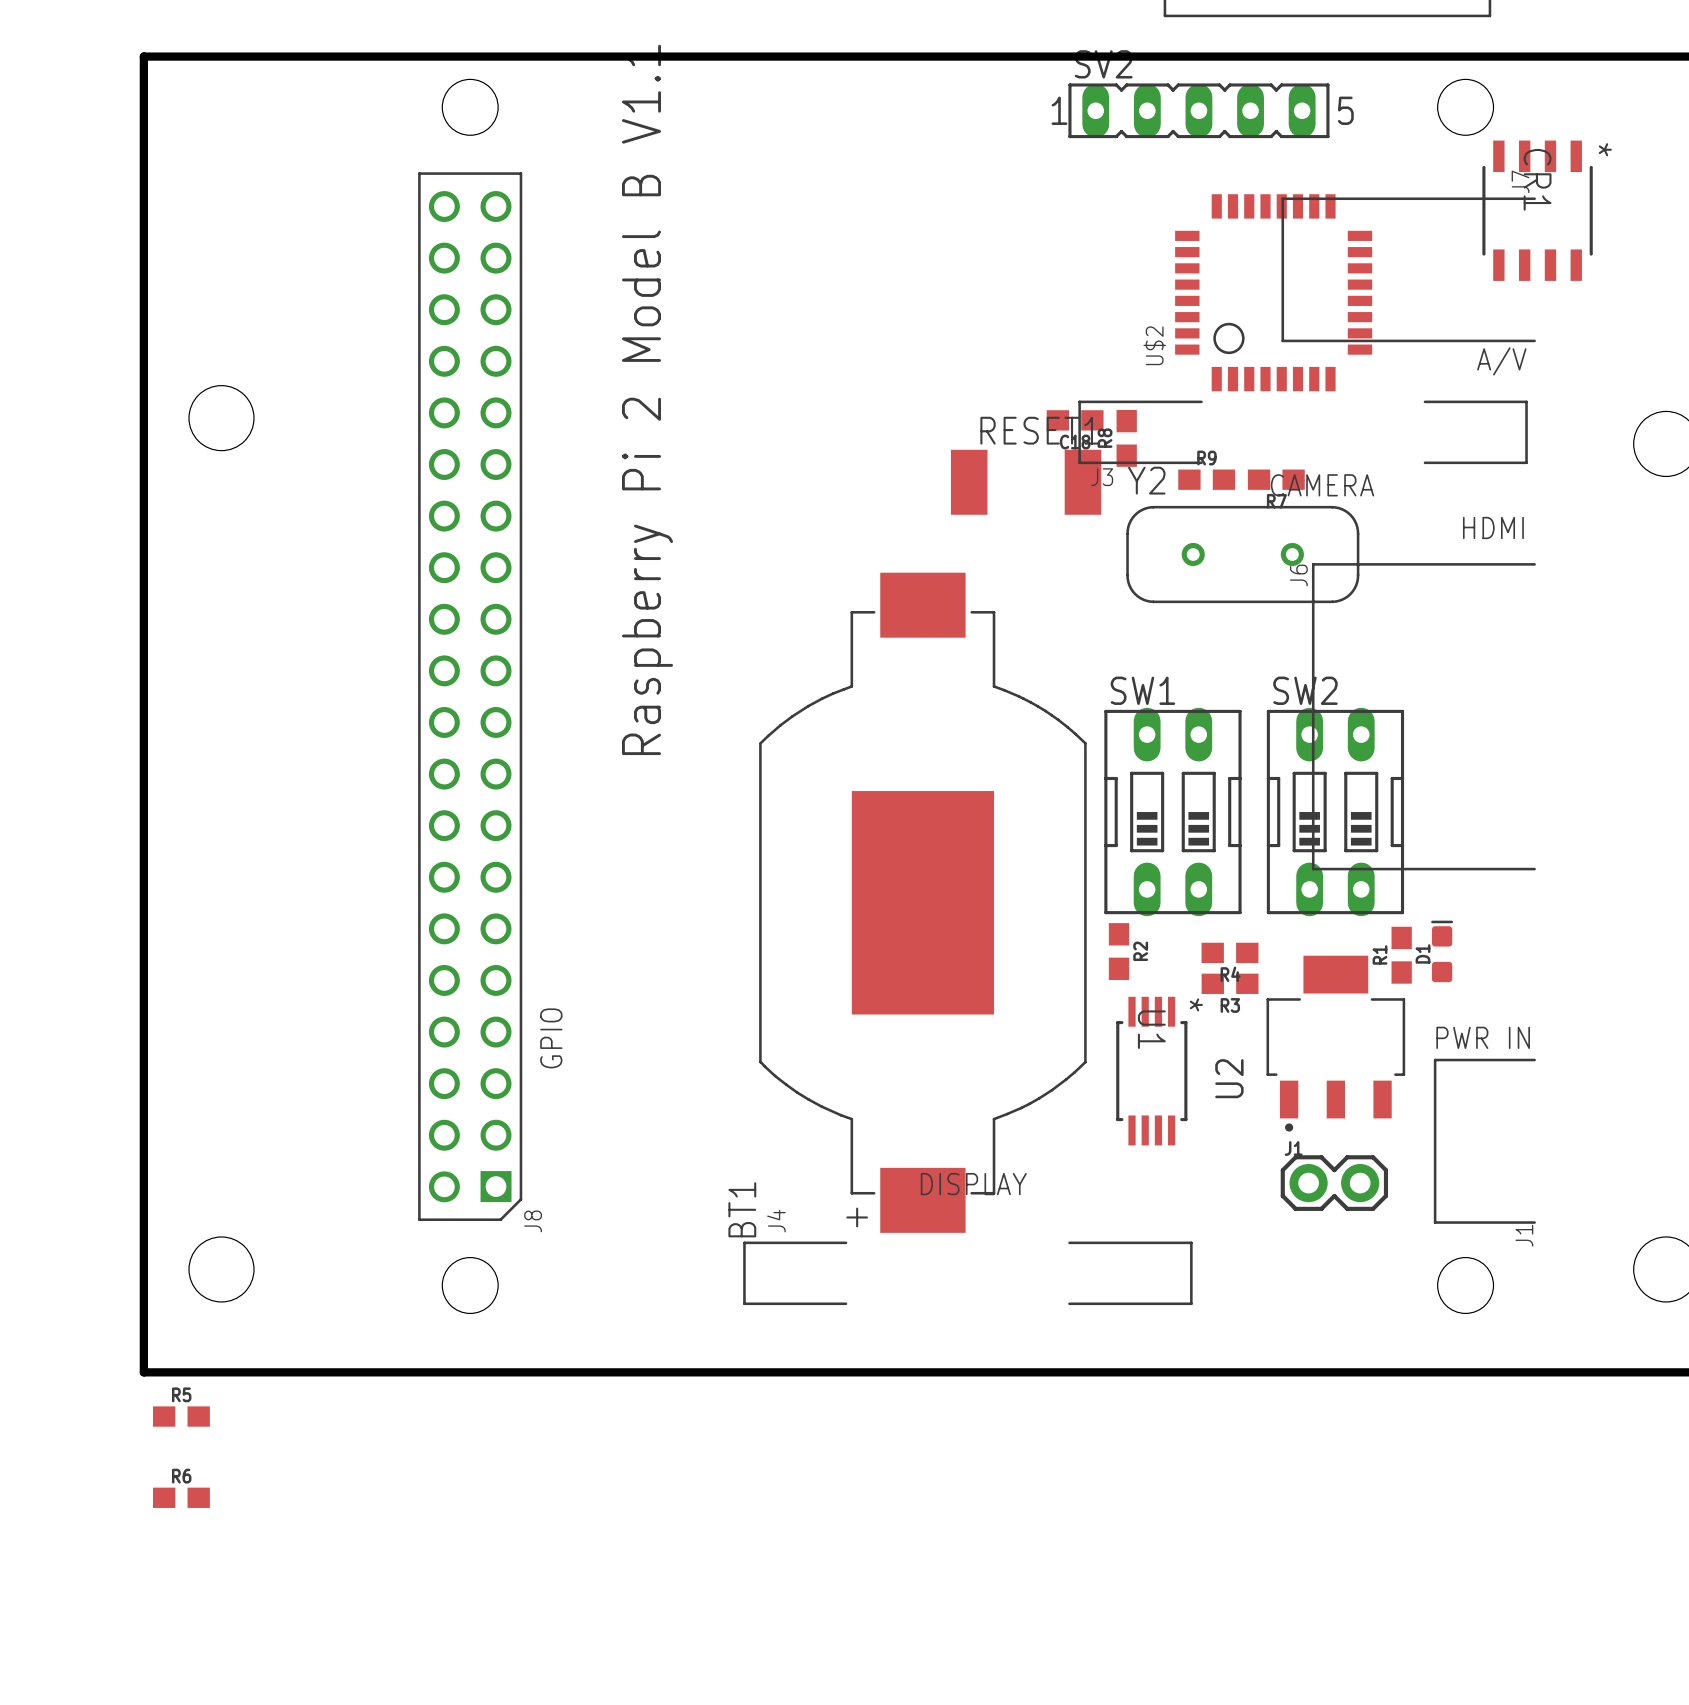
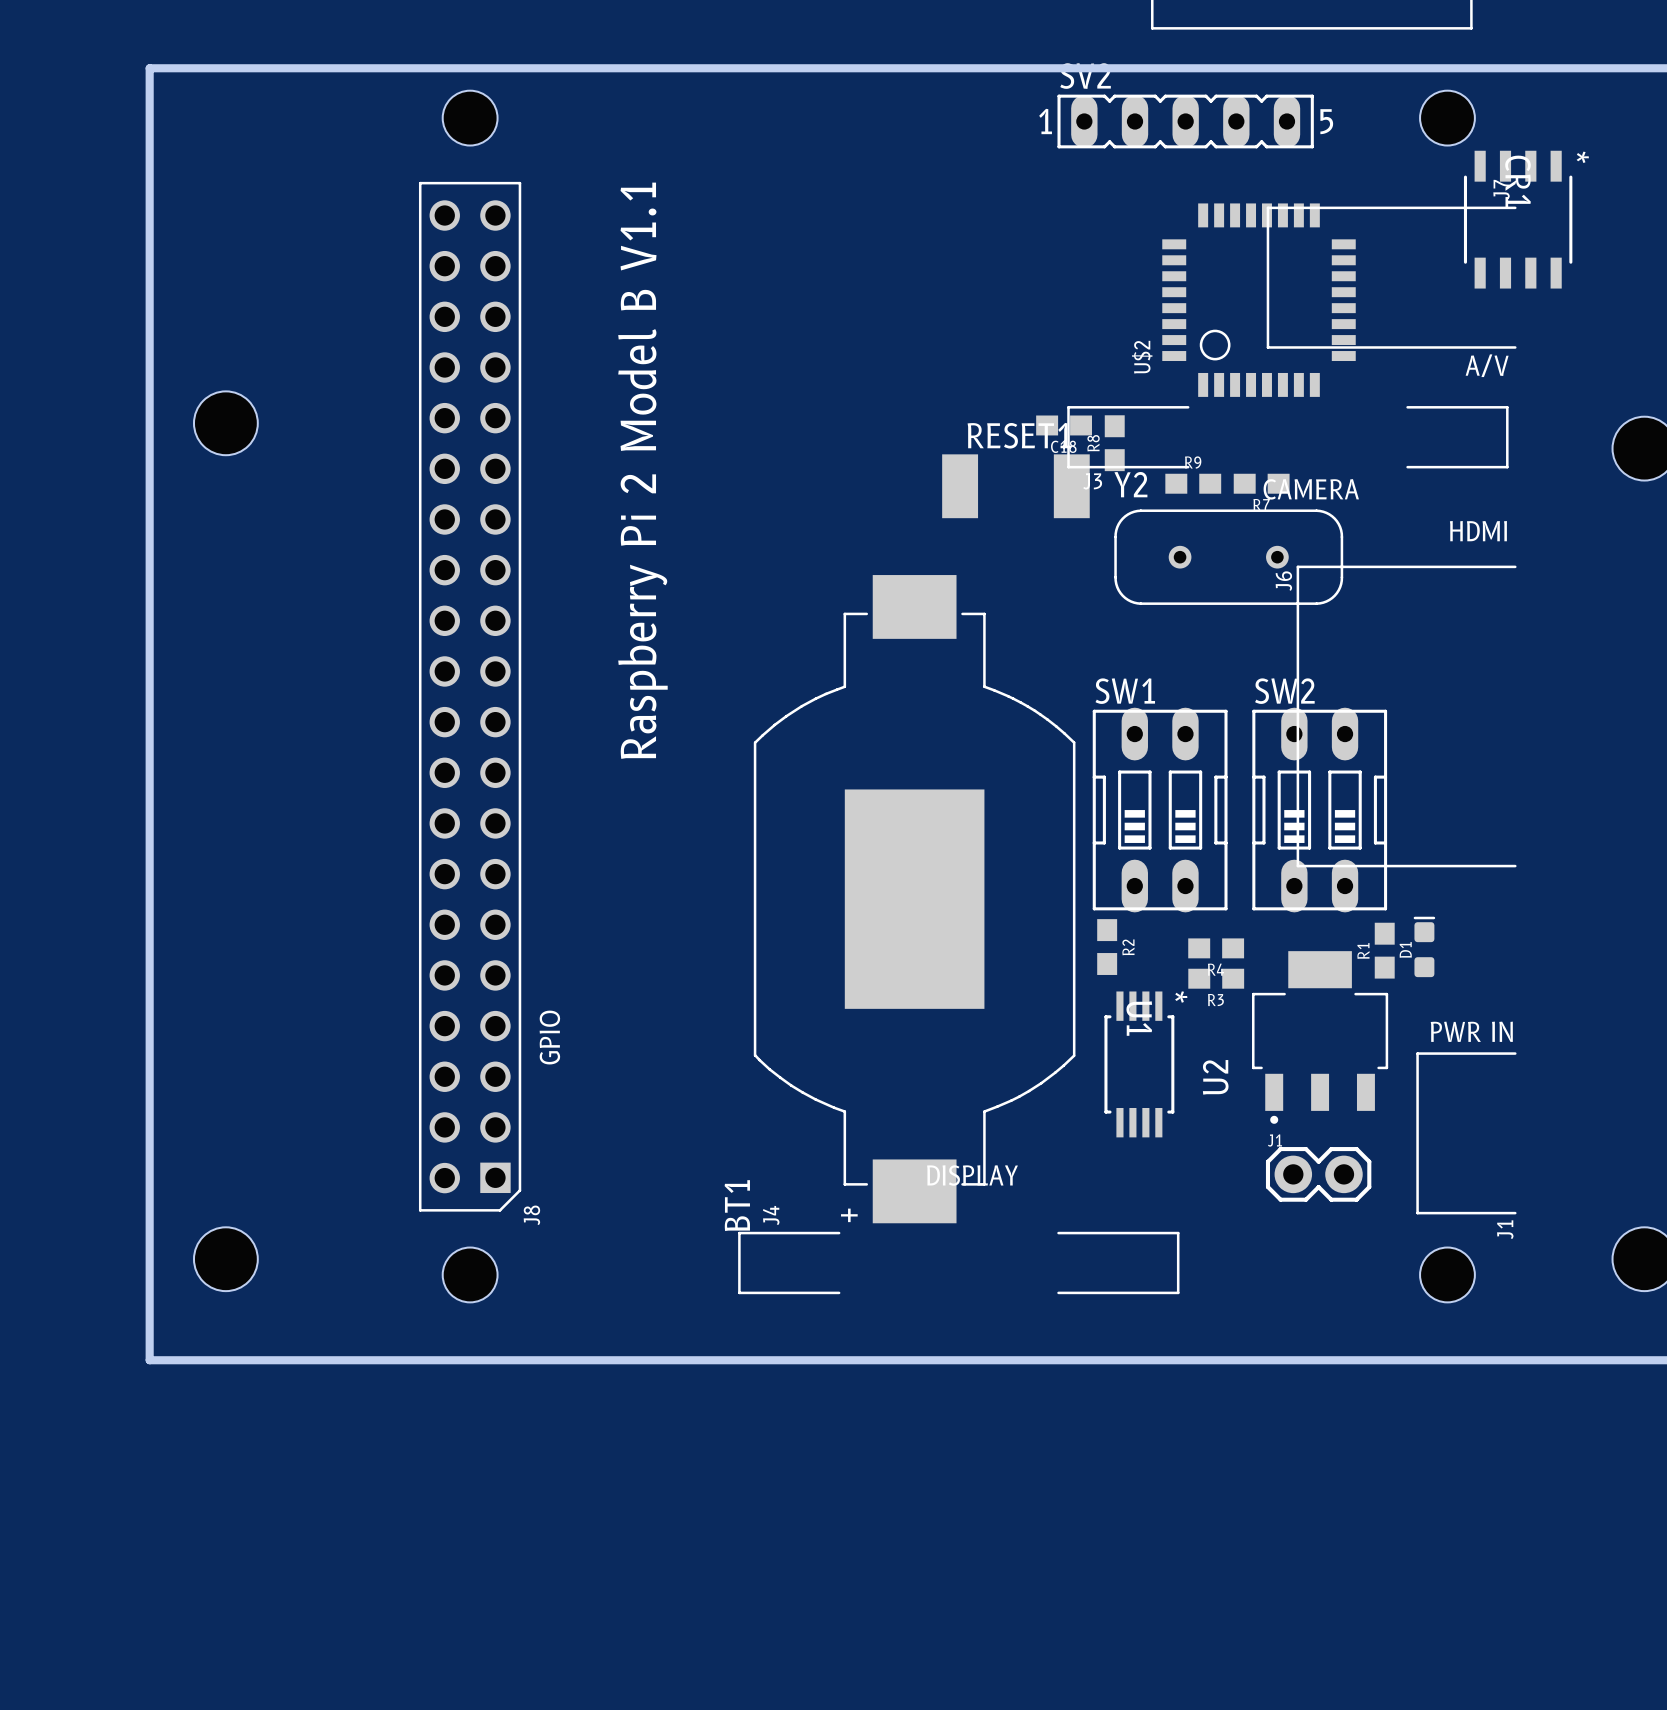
R5: (181, 1416) -> none
R6: (181, 1497) -> none

